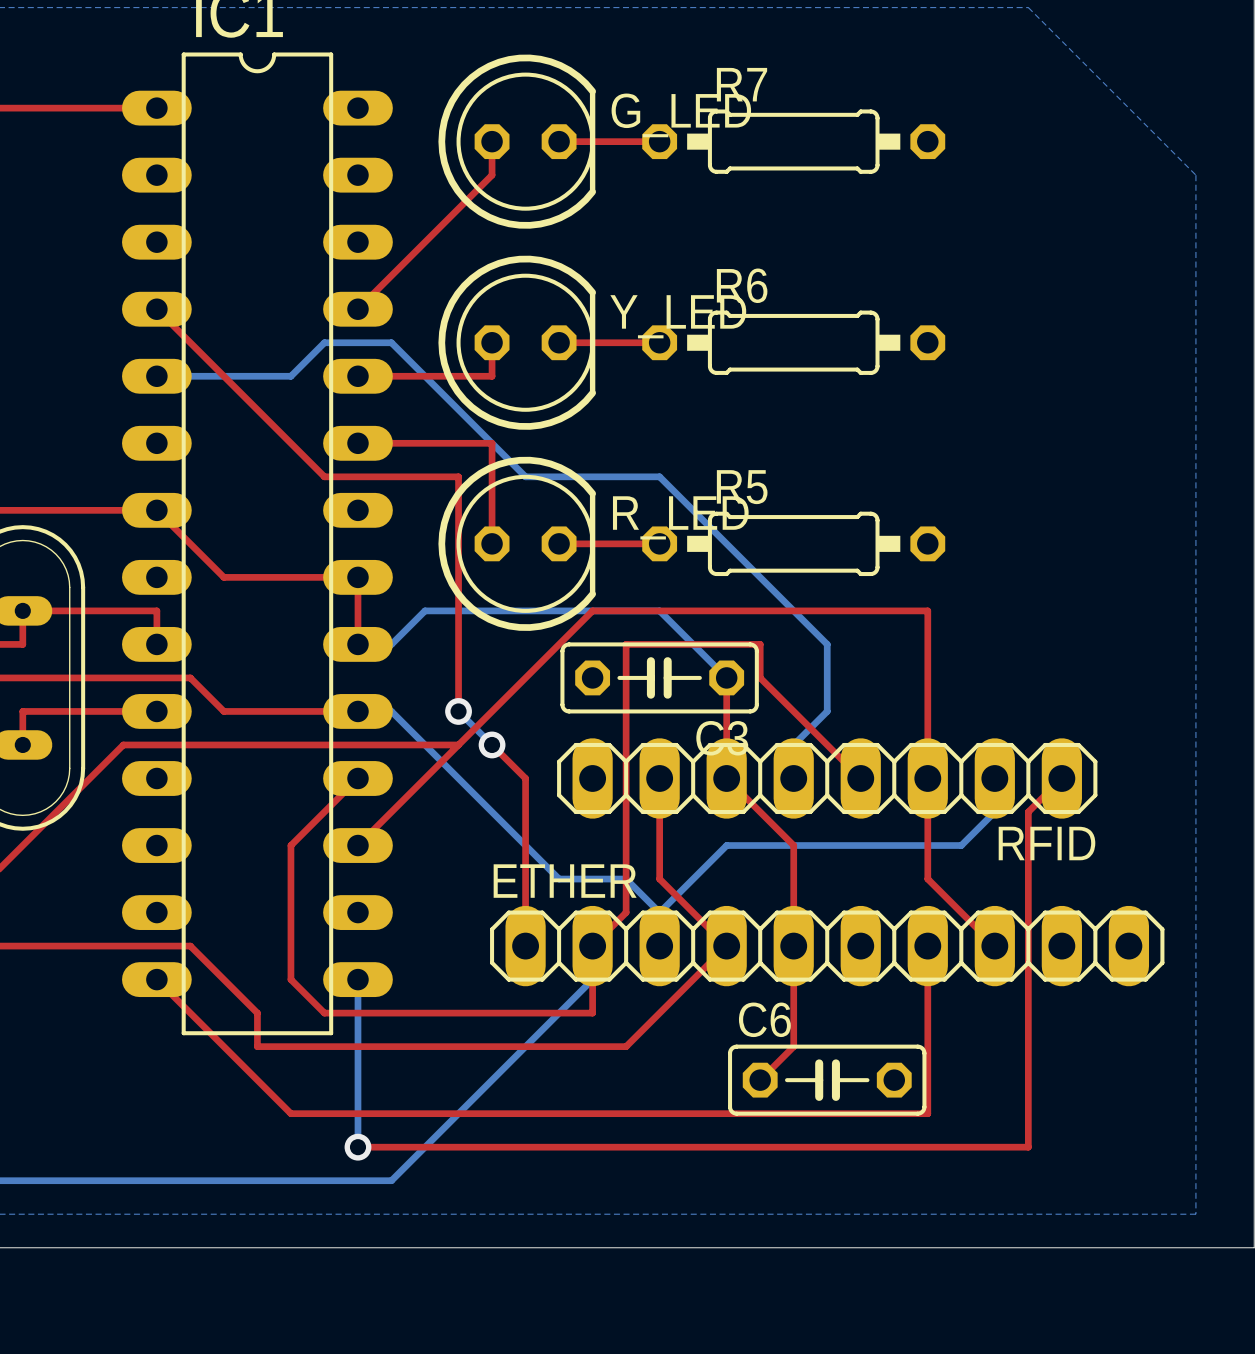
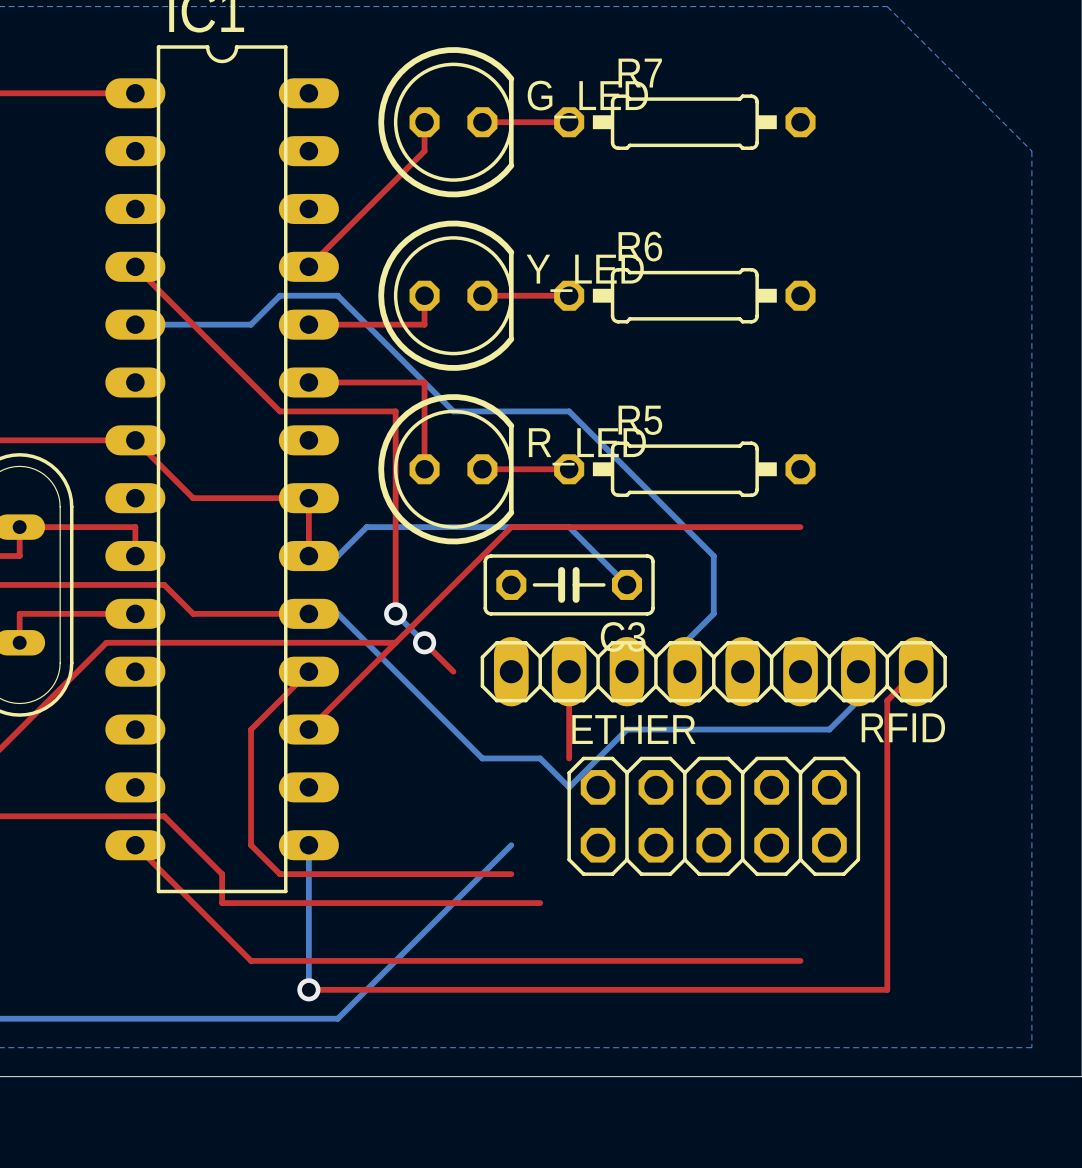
top track: (927, 610) (927, 879) (994, 946) -> none
top track: (726, 677) (726, 778) (793, 845) (793, 1046) (760, 1080) -> none
top track: (525, 778) (525, 946) -> none
top track: (860, 778) (760, 677) (760, 644) (626, 644) (626, 912) (592, 946) (592, 1013) -> none
top track: (659, 879) (726, 946) (626, 1046) -> none
ETHER name position: ETHER (565, 881) -> ETHER (633, 729)
ETHER footprint: [490, 905, 1165, 987] -> [567, 756, 861, 876]
top track: (927, 946) (927, 1113) -> none
C6: (827, 1080) -> none

